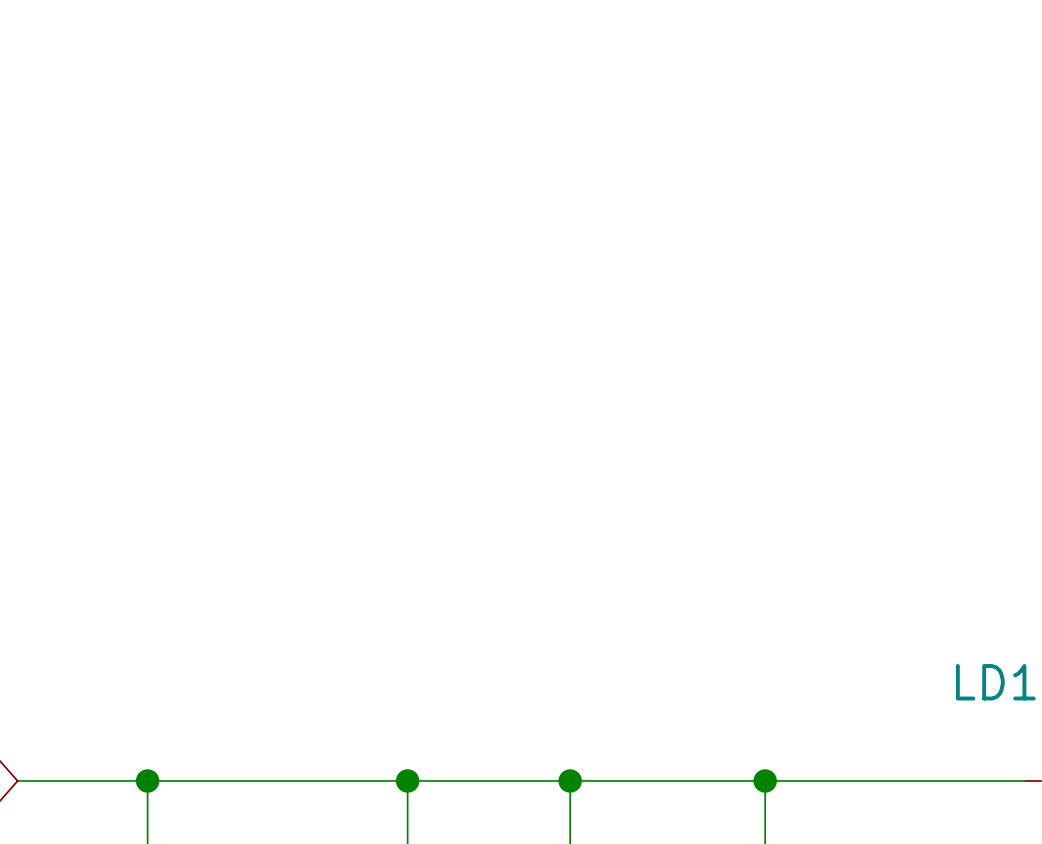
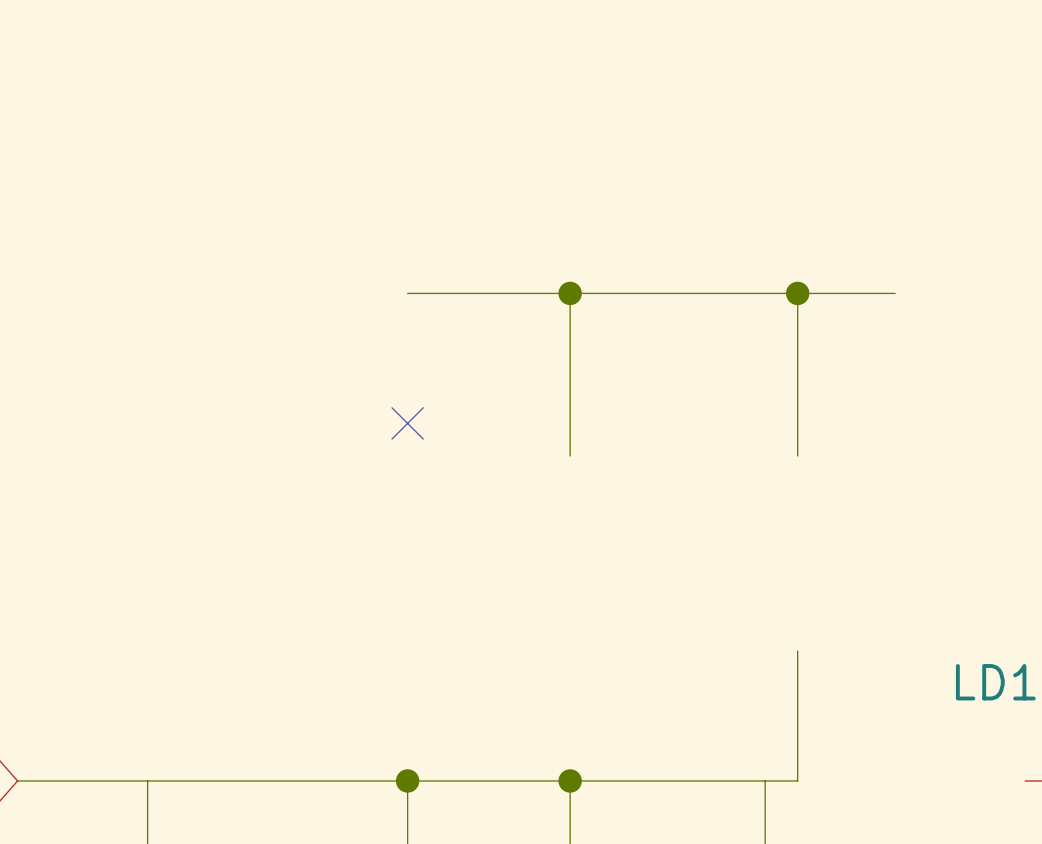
wire: none -> (407, 293) (895, 293)
wire: none -> (570, 293) (570, 455)
junction: none -> (570, 293)
wire: none -> (797, 293) (797, 455)
junction: none -> (797, 293)
no-connect mark: none -> (407, 423)
junction: (147, 780) -> none
junction: (765, 780) -> none
wire: (797, 780) (1025, 780) -> (797, 780) (797, 650)

